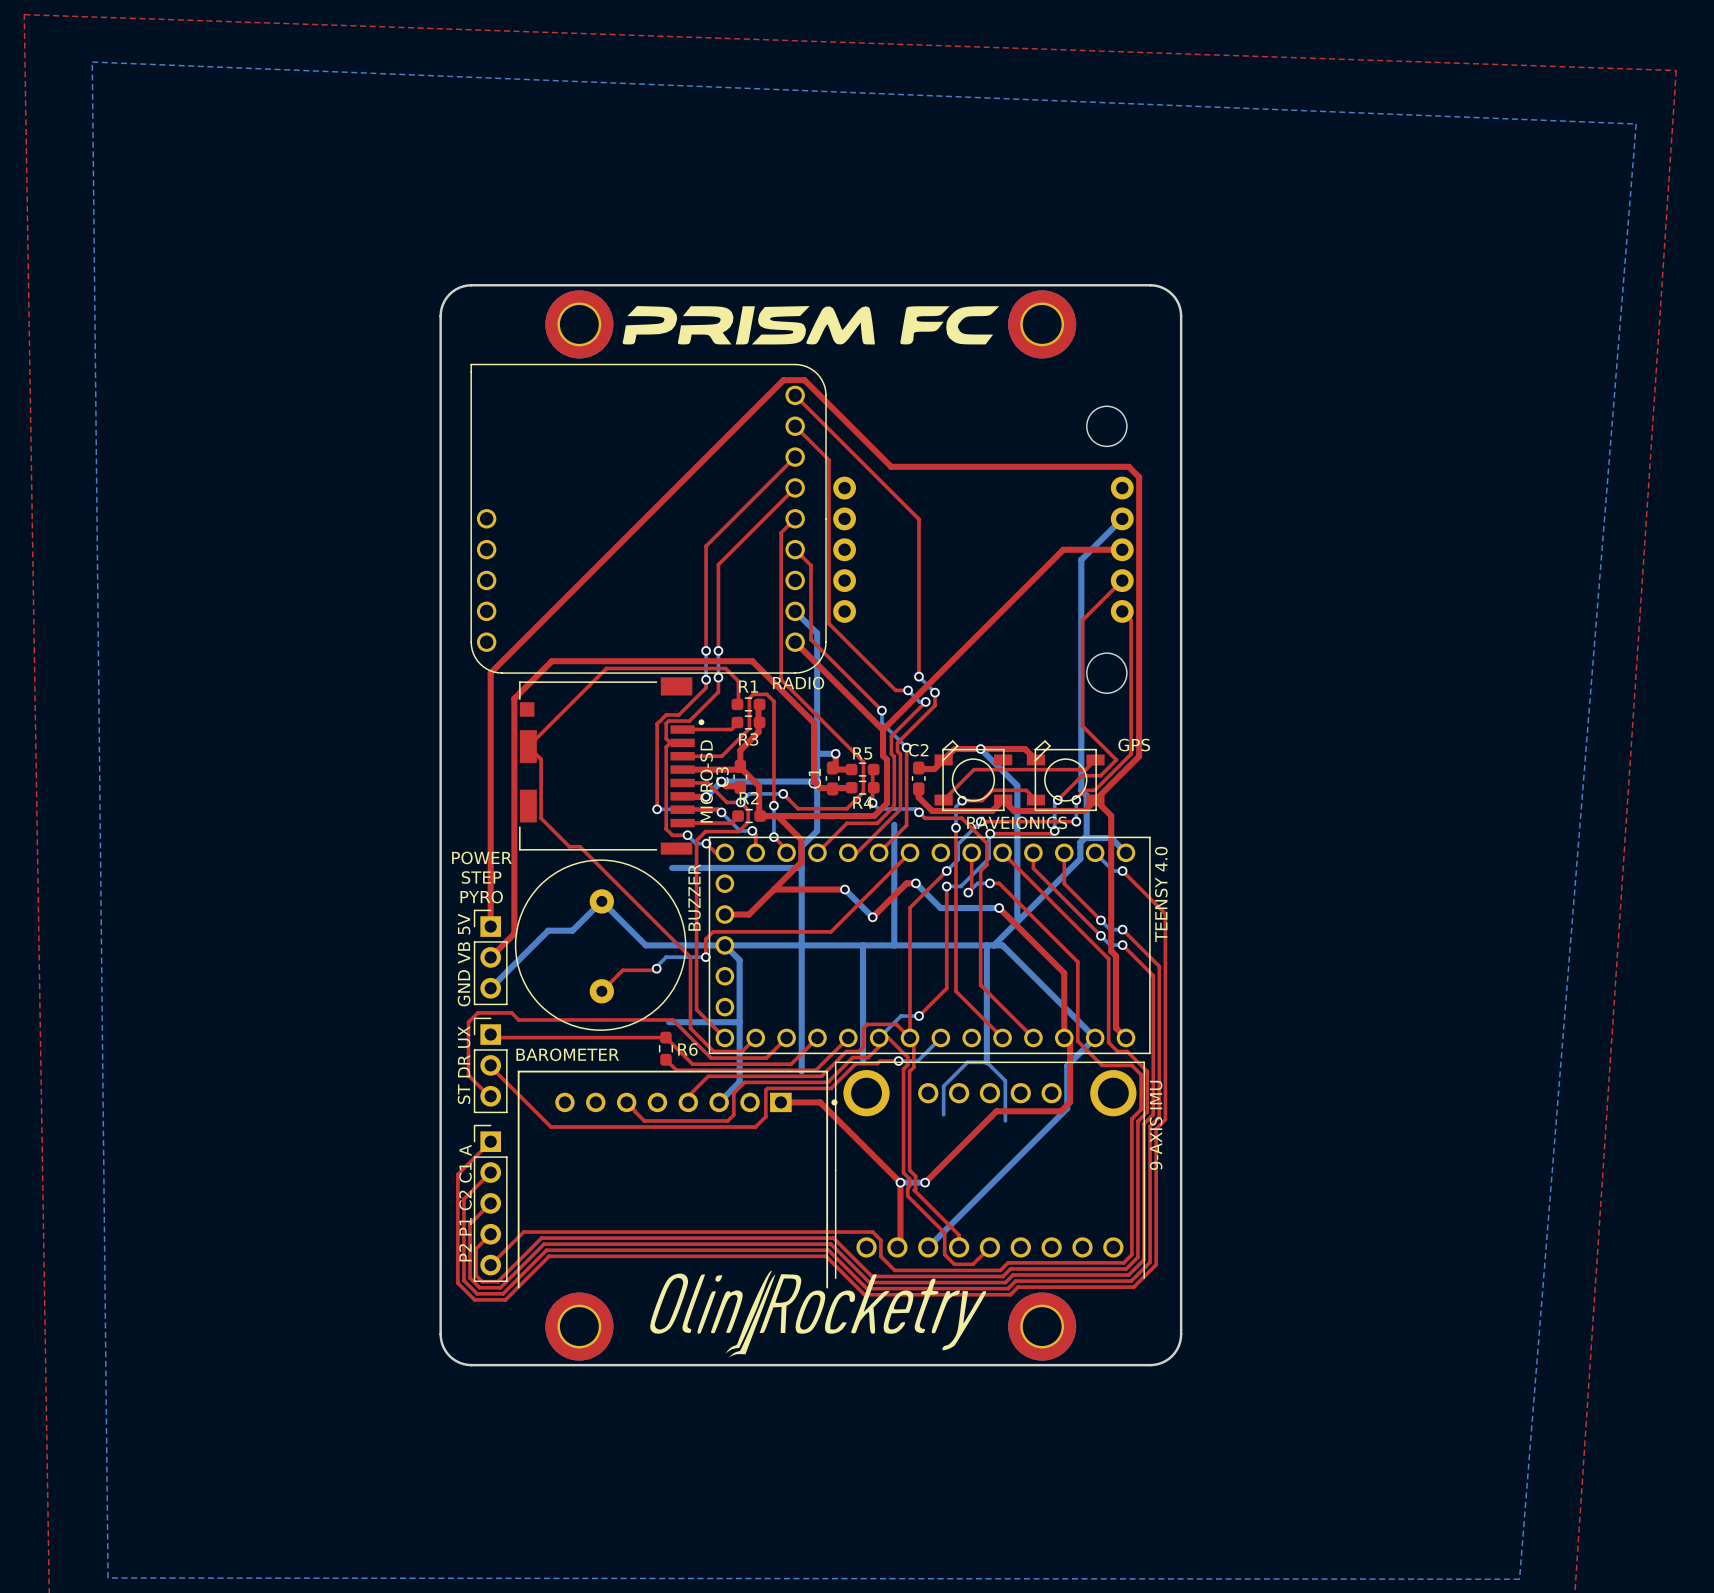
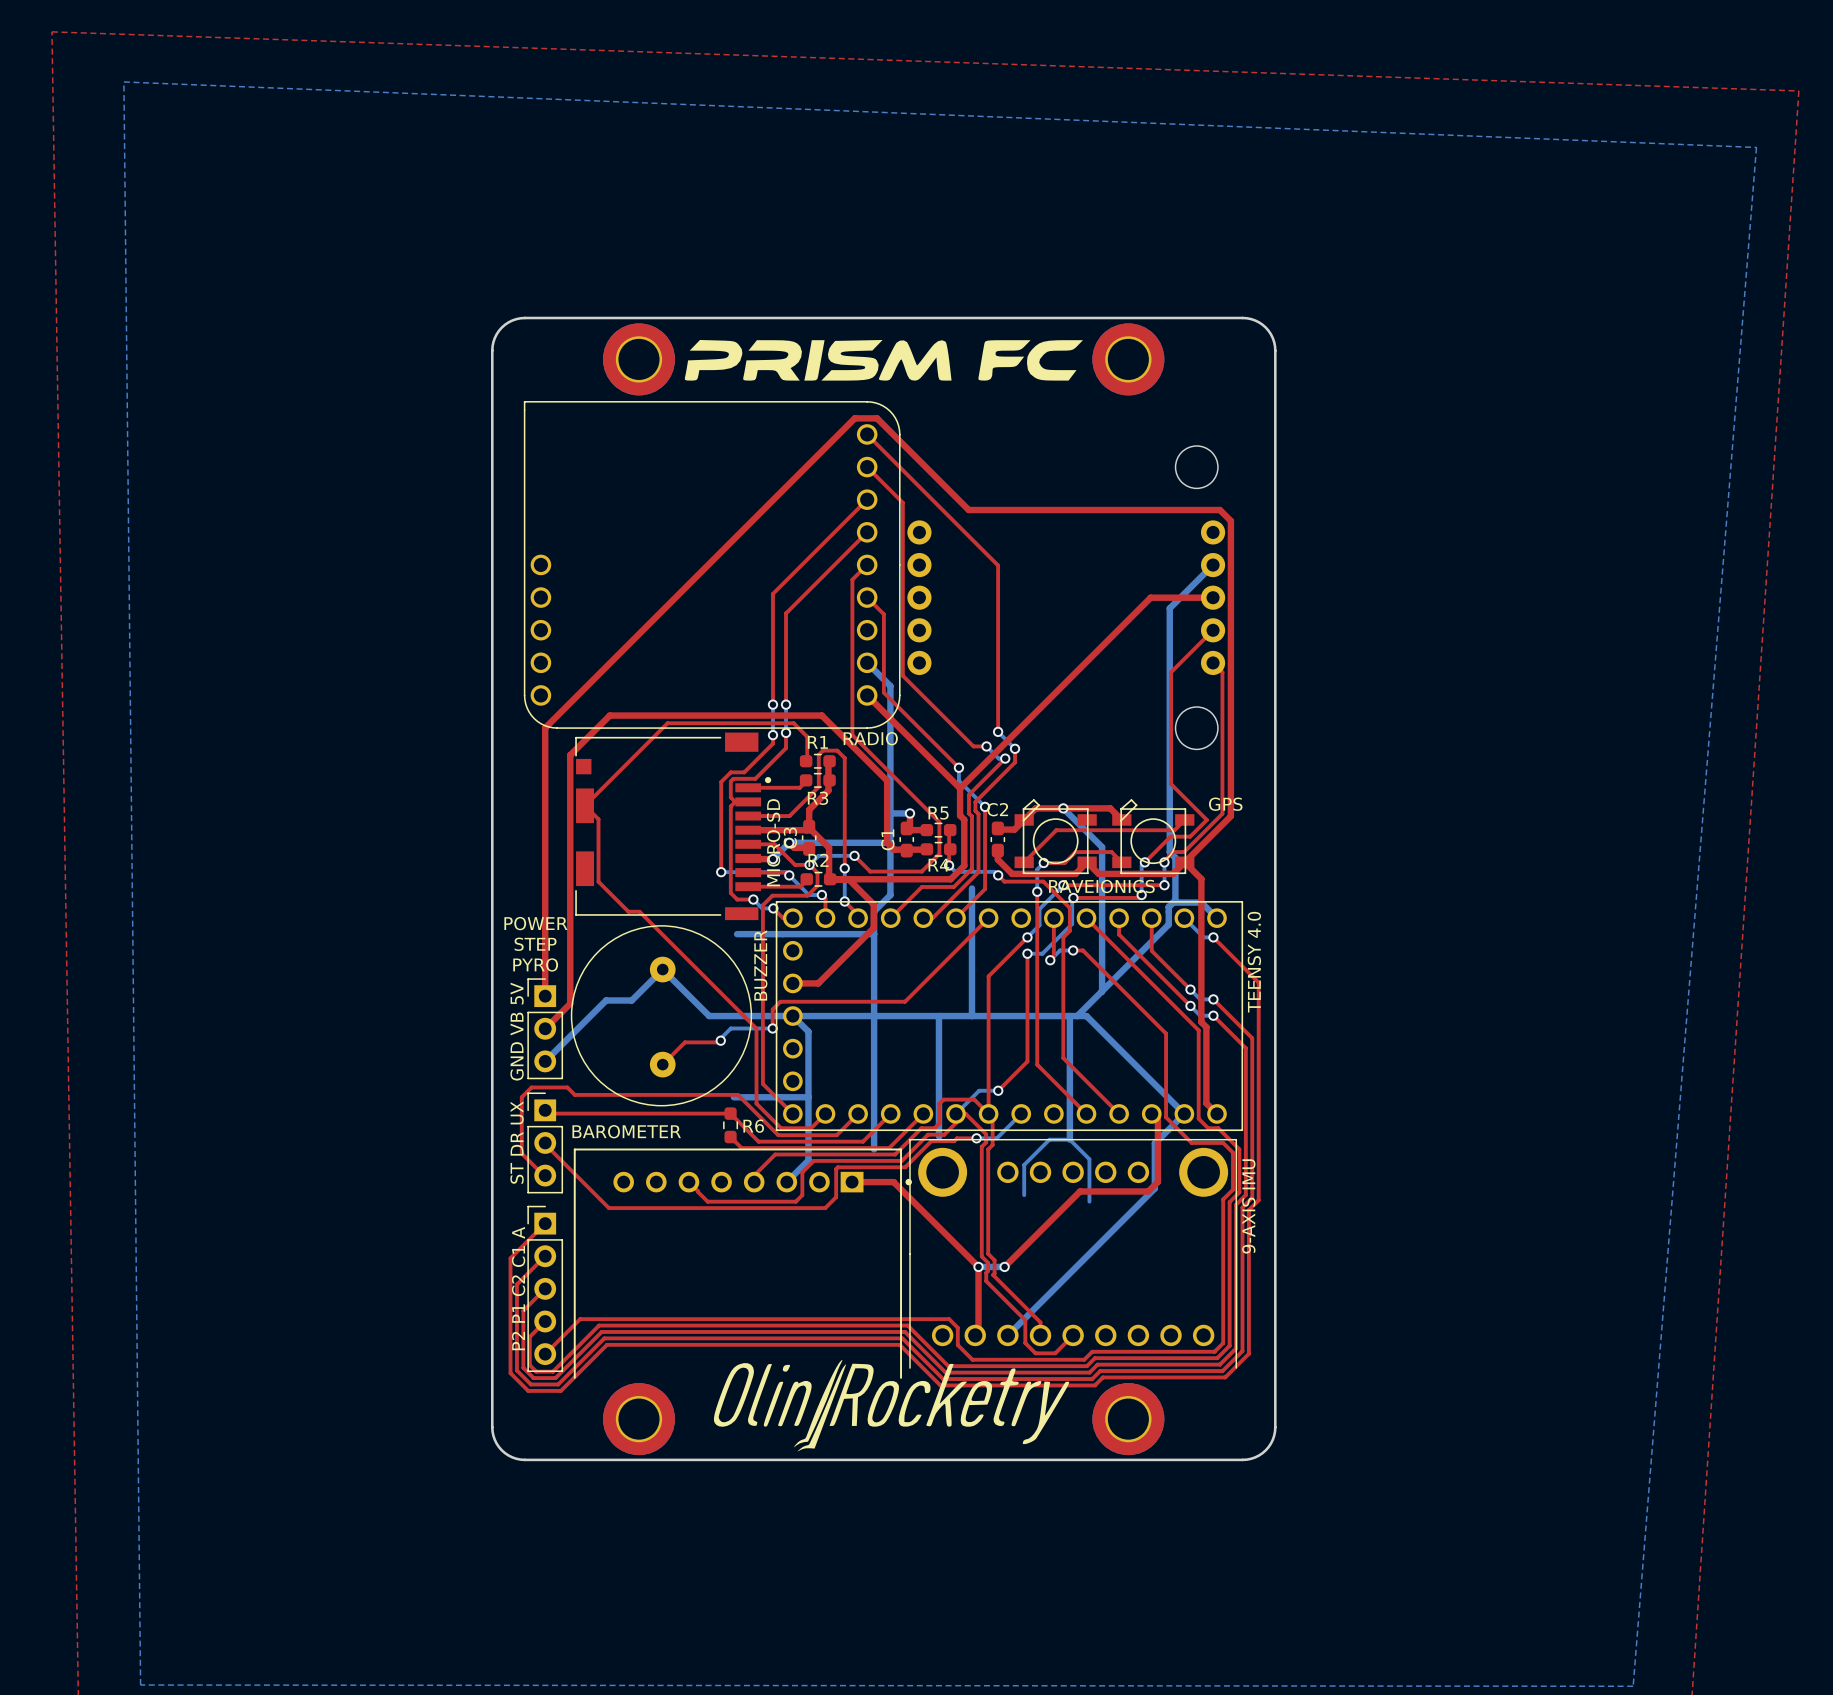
top track: (915, 883) (906, 883) (872, 917) -> none
bottom track: (915, 883) (940, 908) (999, 908) -> none
via: (915, 883) -> none
top track: (773, 889) (844, 889) -> none
bottom track: (844, 889) (872, 917) -> none
via: (844, 889) -> none
top track: (999, 908) (1064, 973) (1064, 1037) -> none
via: (999, 908) -> none
via: (872, 917) -> none

